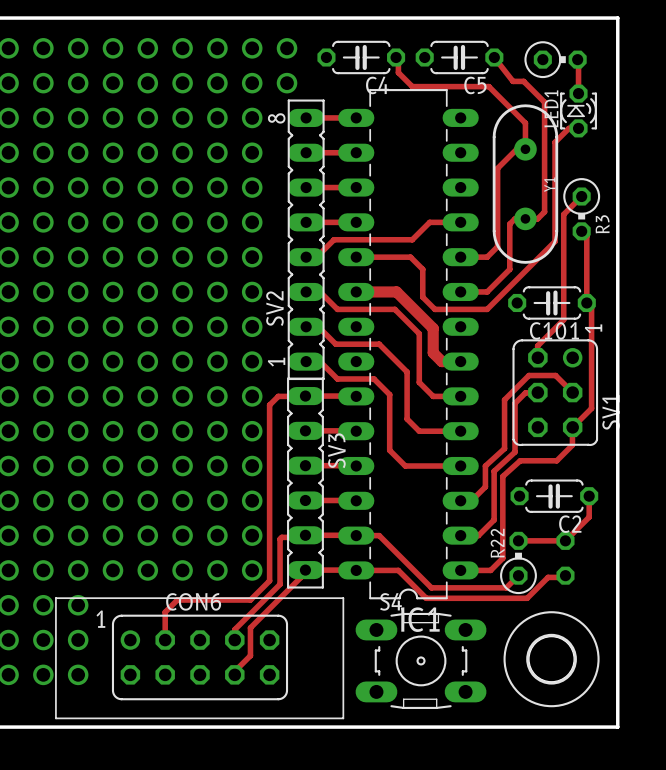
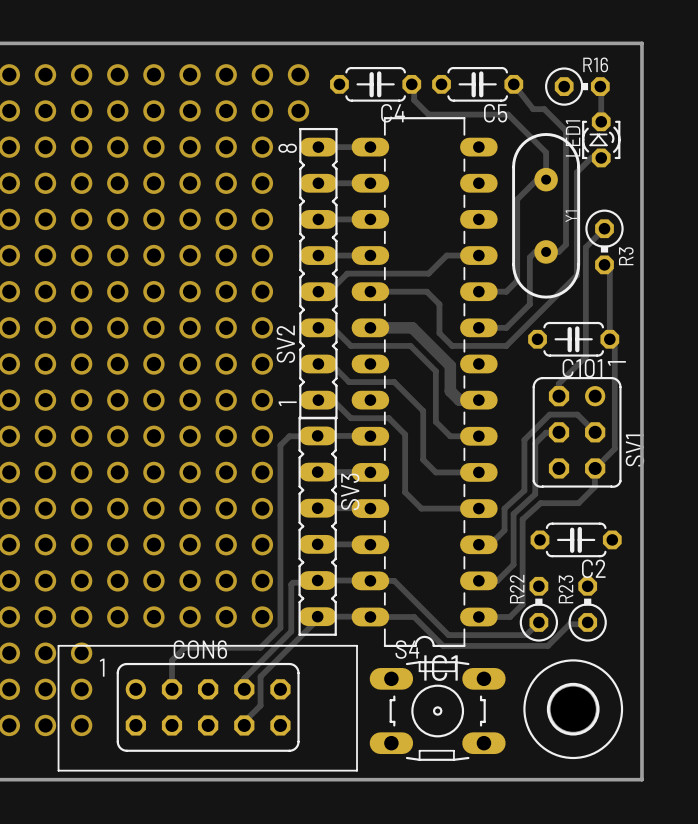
R16 name: none -> R16 (595, 64)
track: (589, 496) (589, 517) (565, 540) (518, 540) -> none
R23 side: bottom (565, 558) -> top (587, 609)

